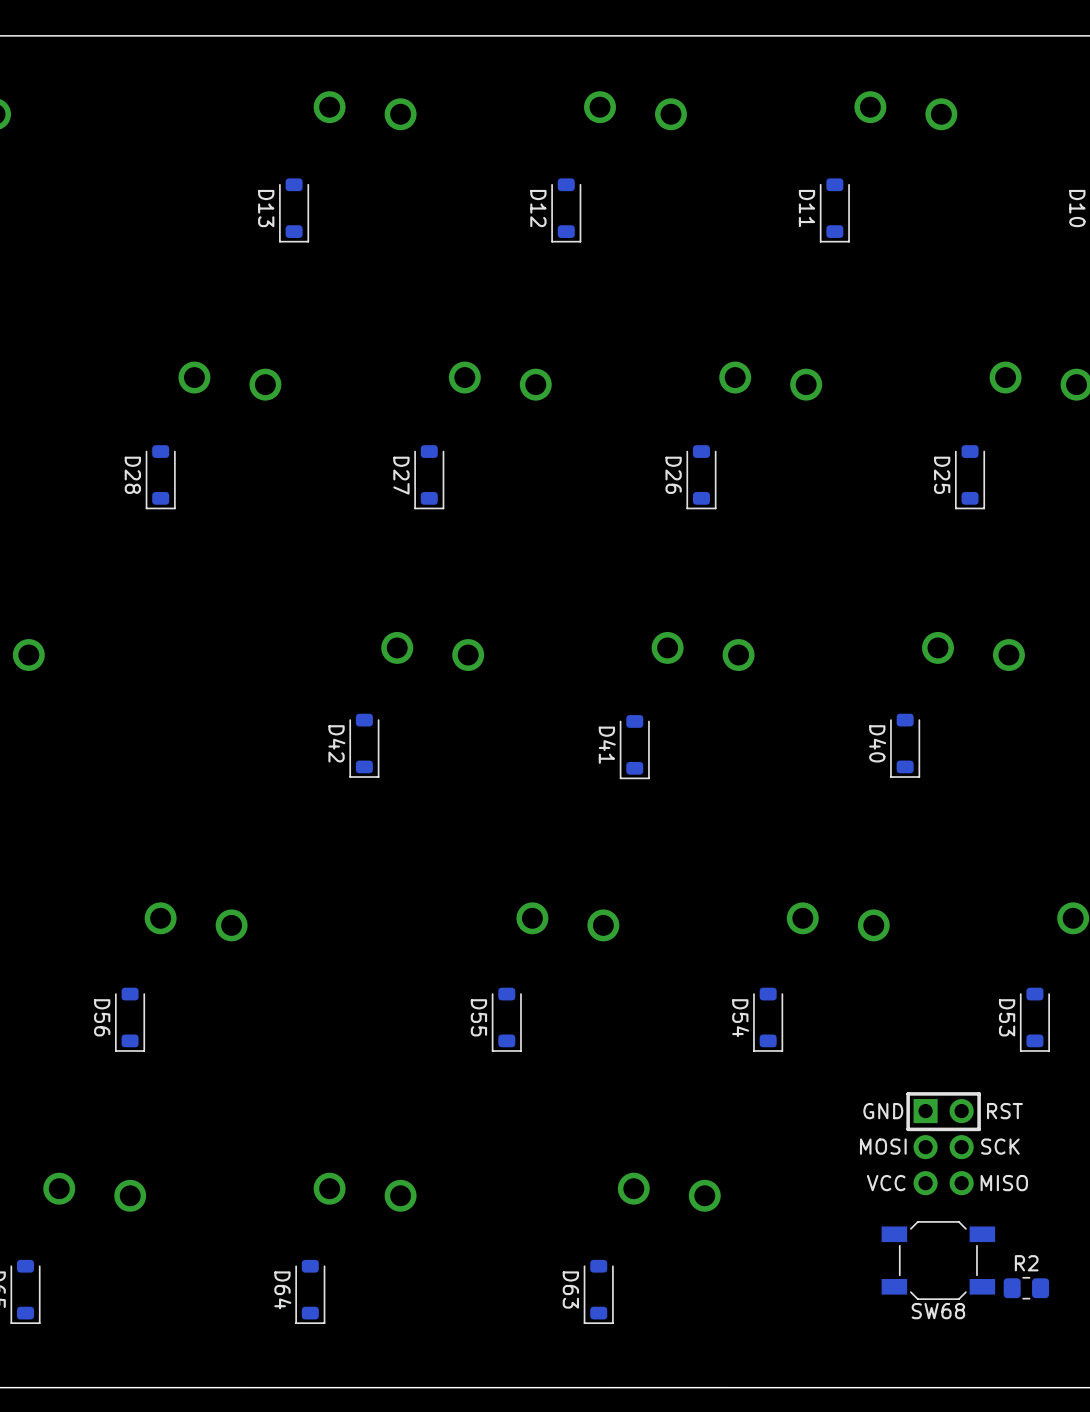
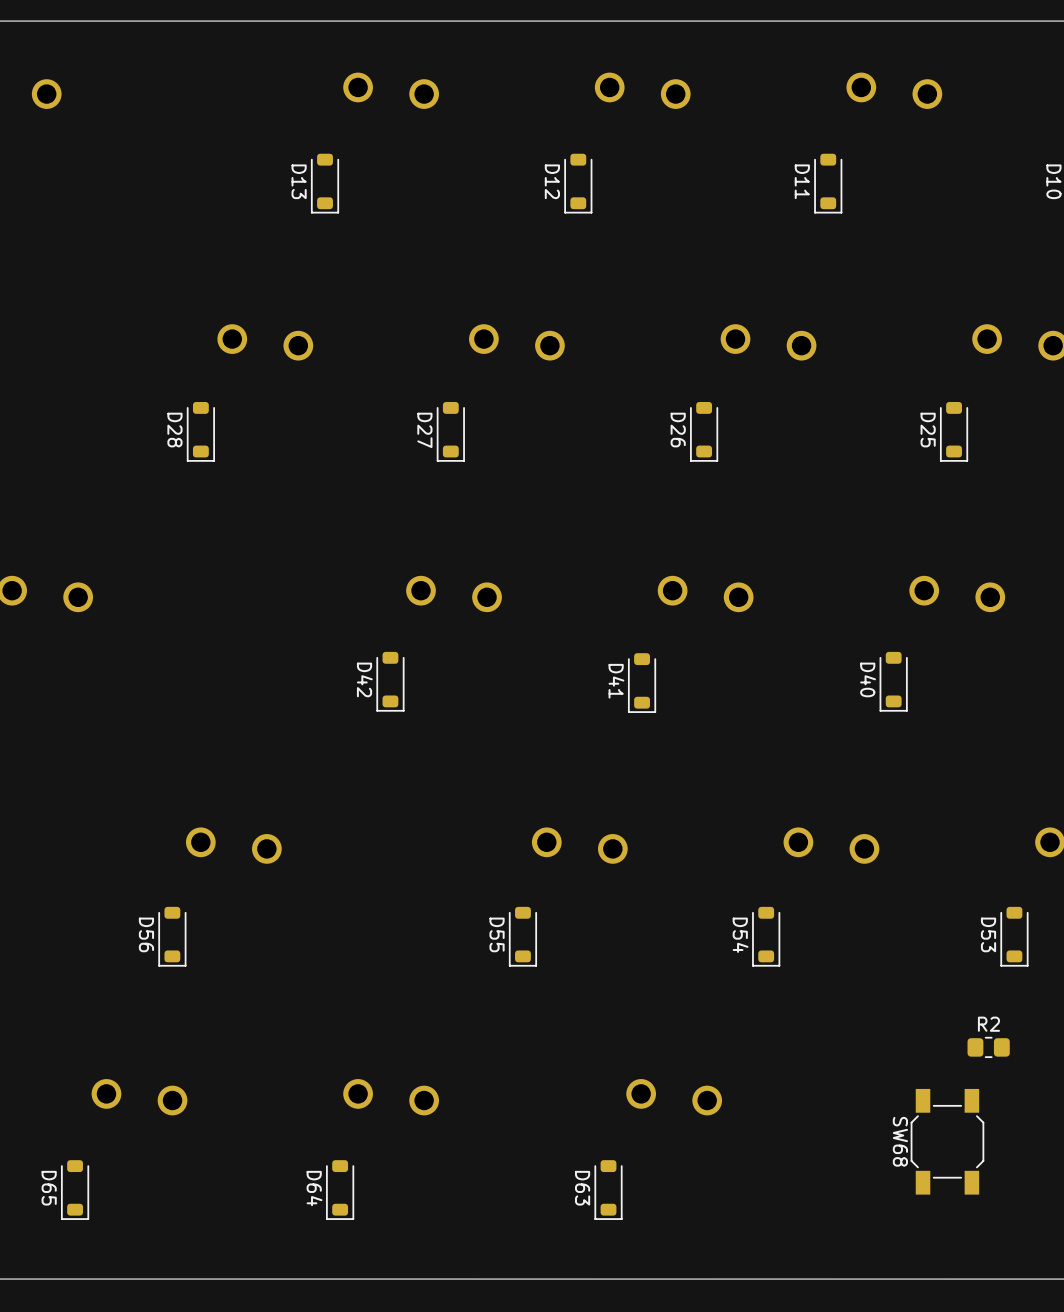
part: (943, 1143) -> none
SW68 rotation: 0° (938, 1260) -> 90° clockwise (947, 1141)
R2 position: (1026, 1288) -> (988, 1047)

